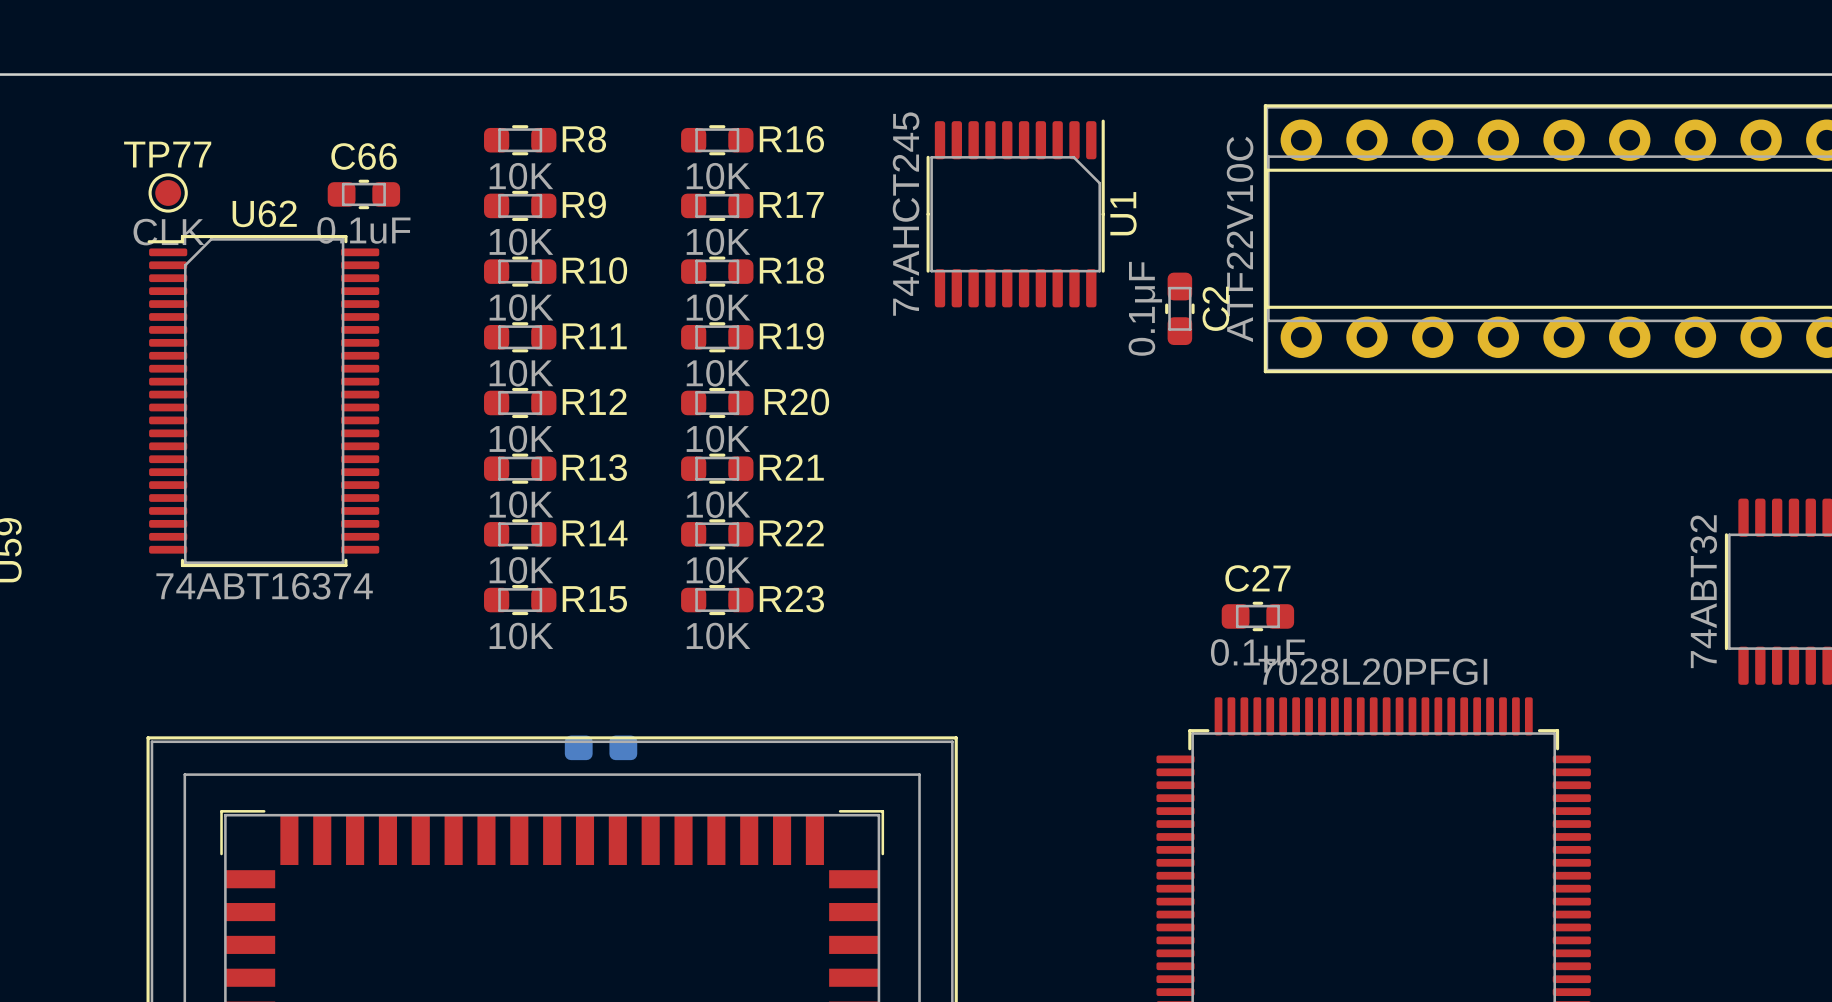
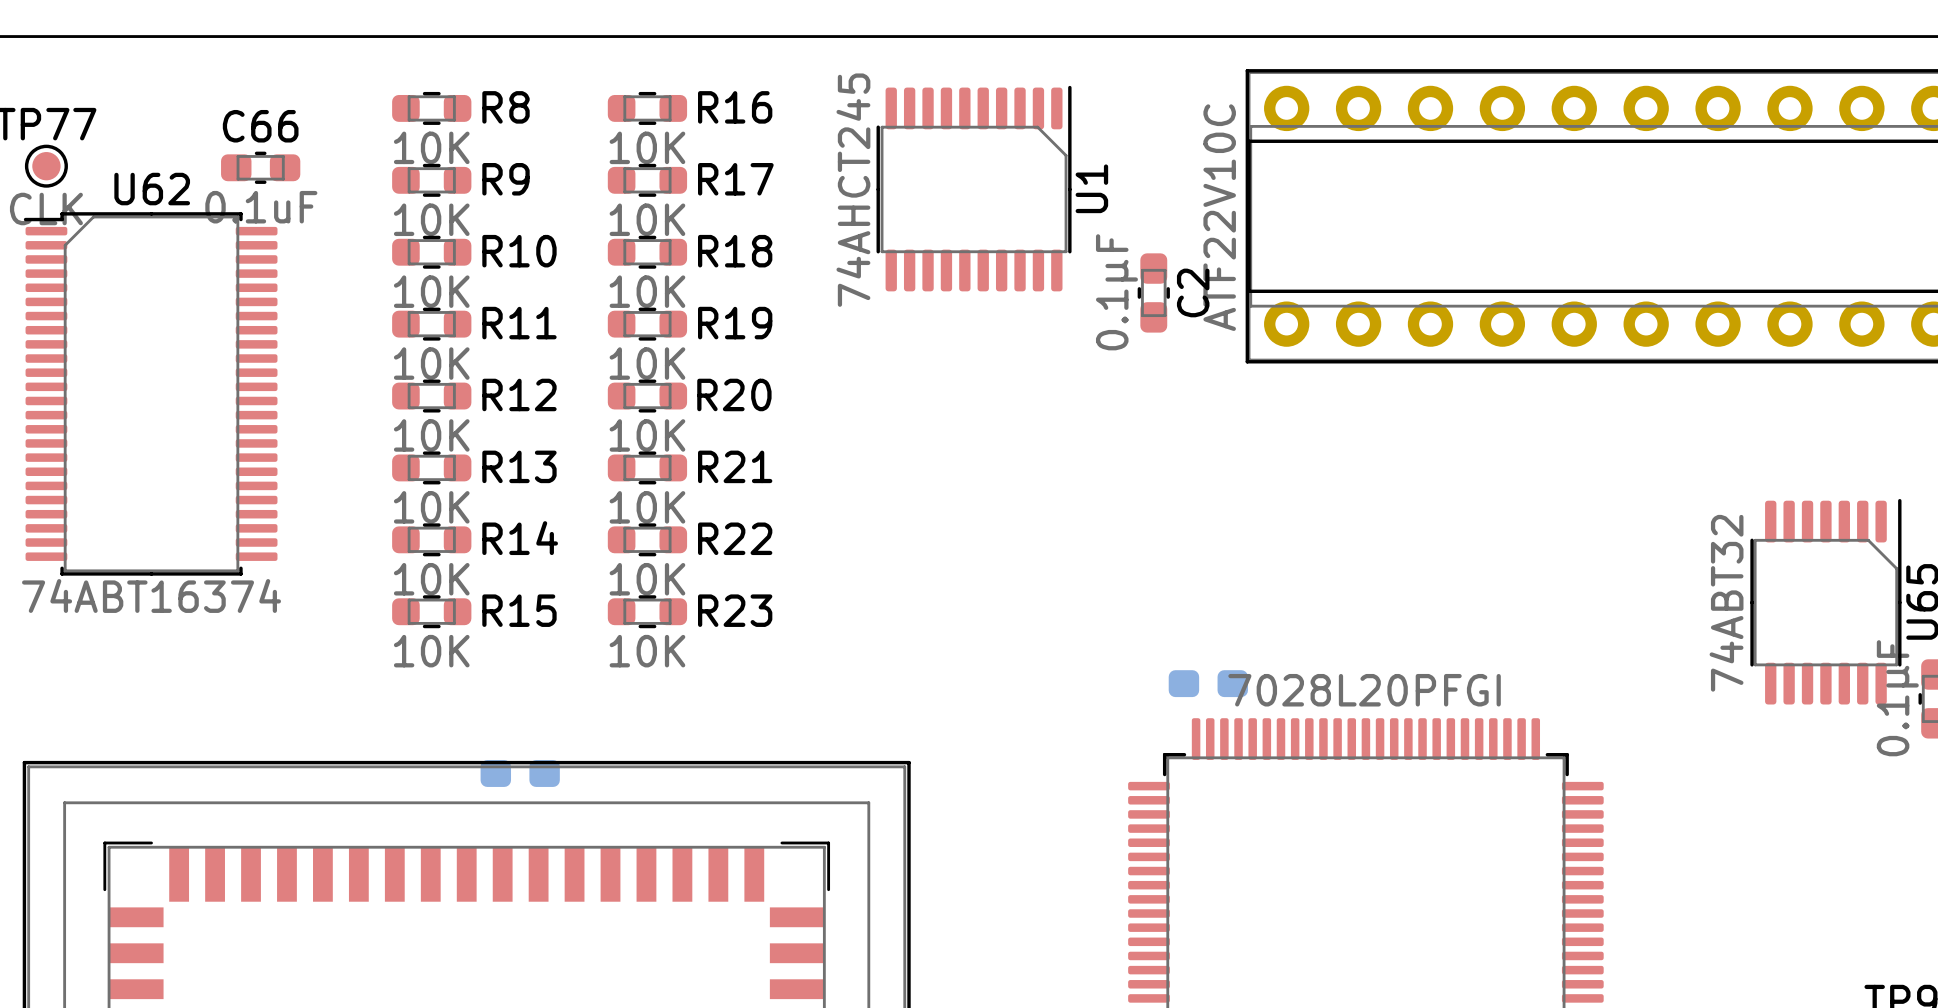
C27 side: top (1257, 616) -> bottom (1208, 683)

